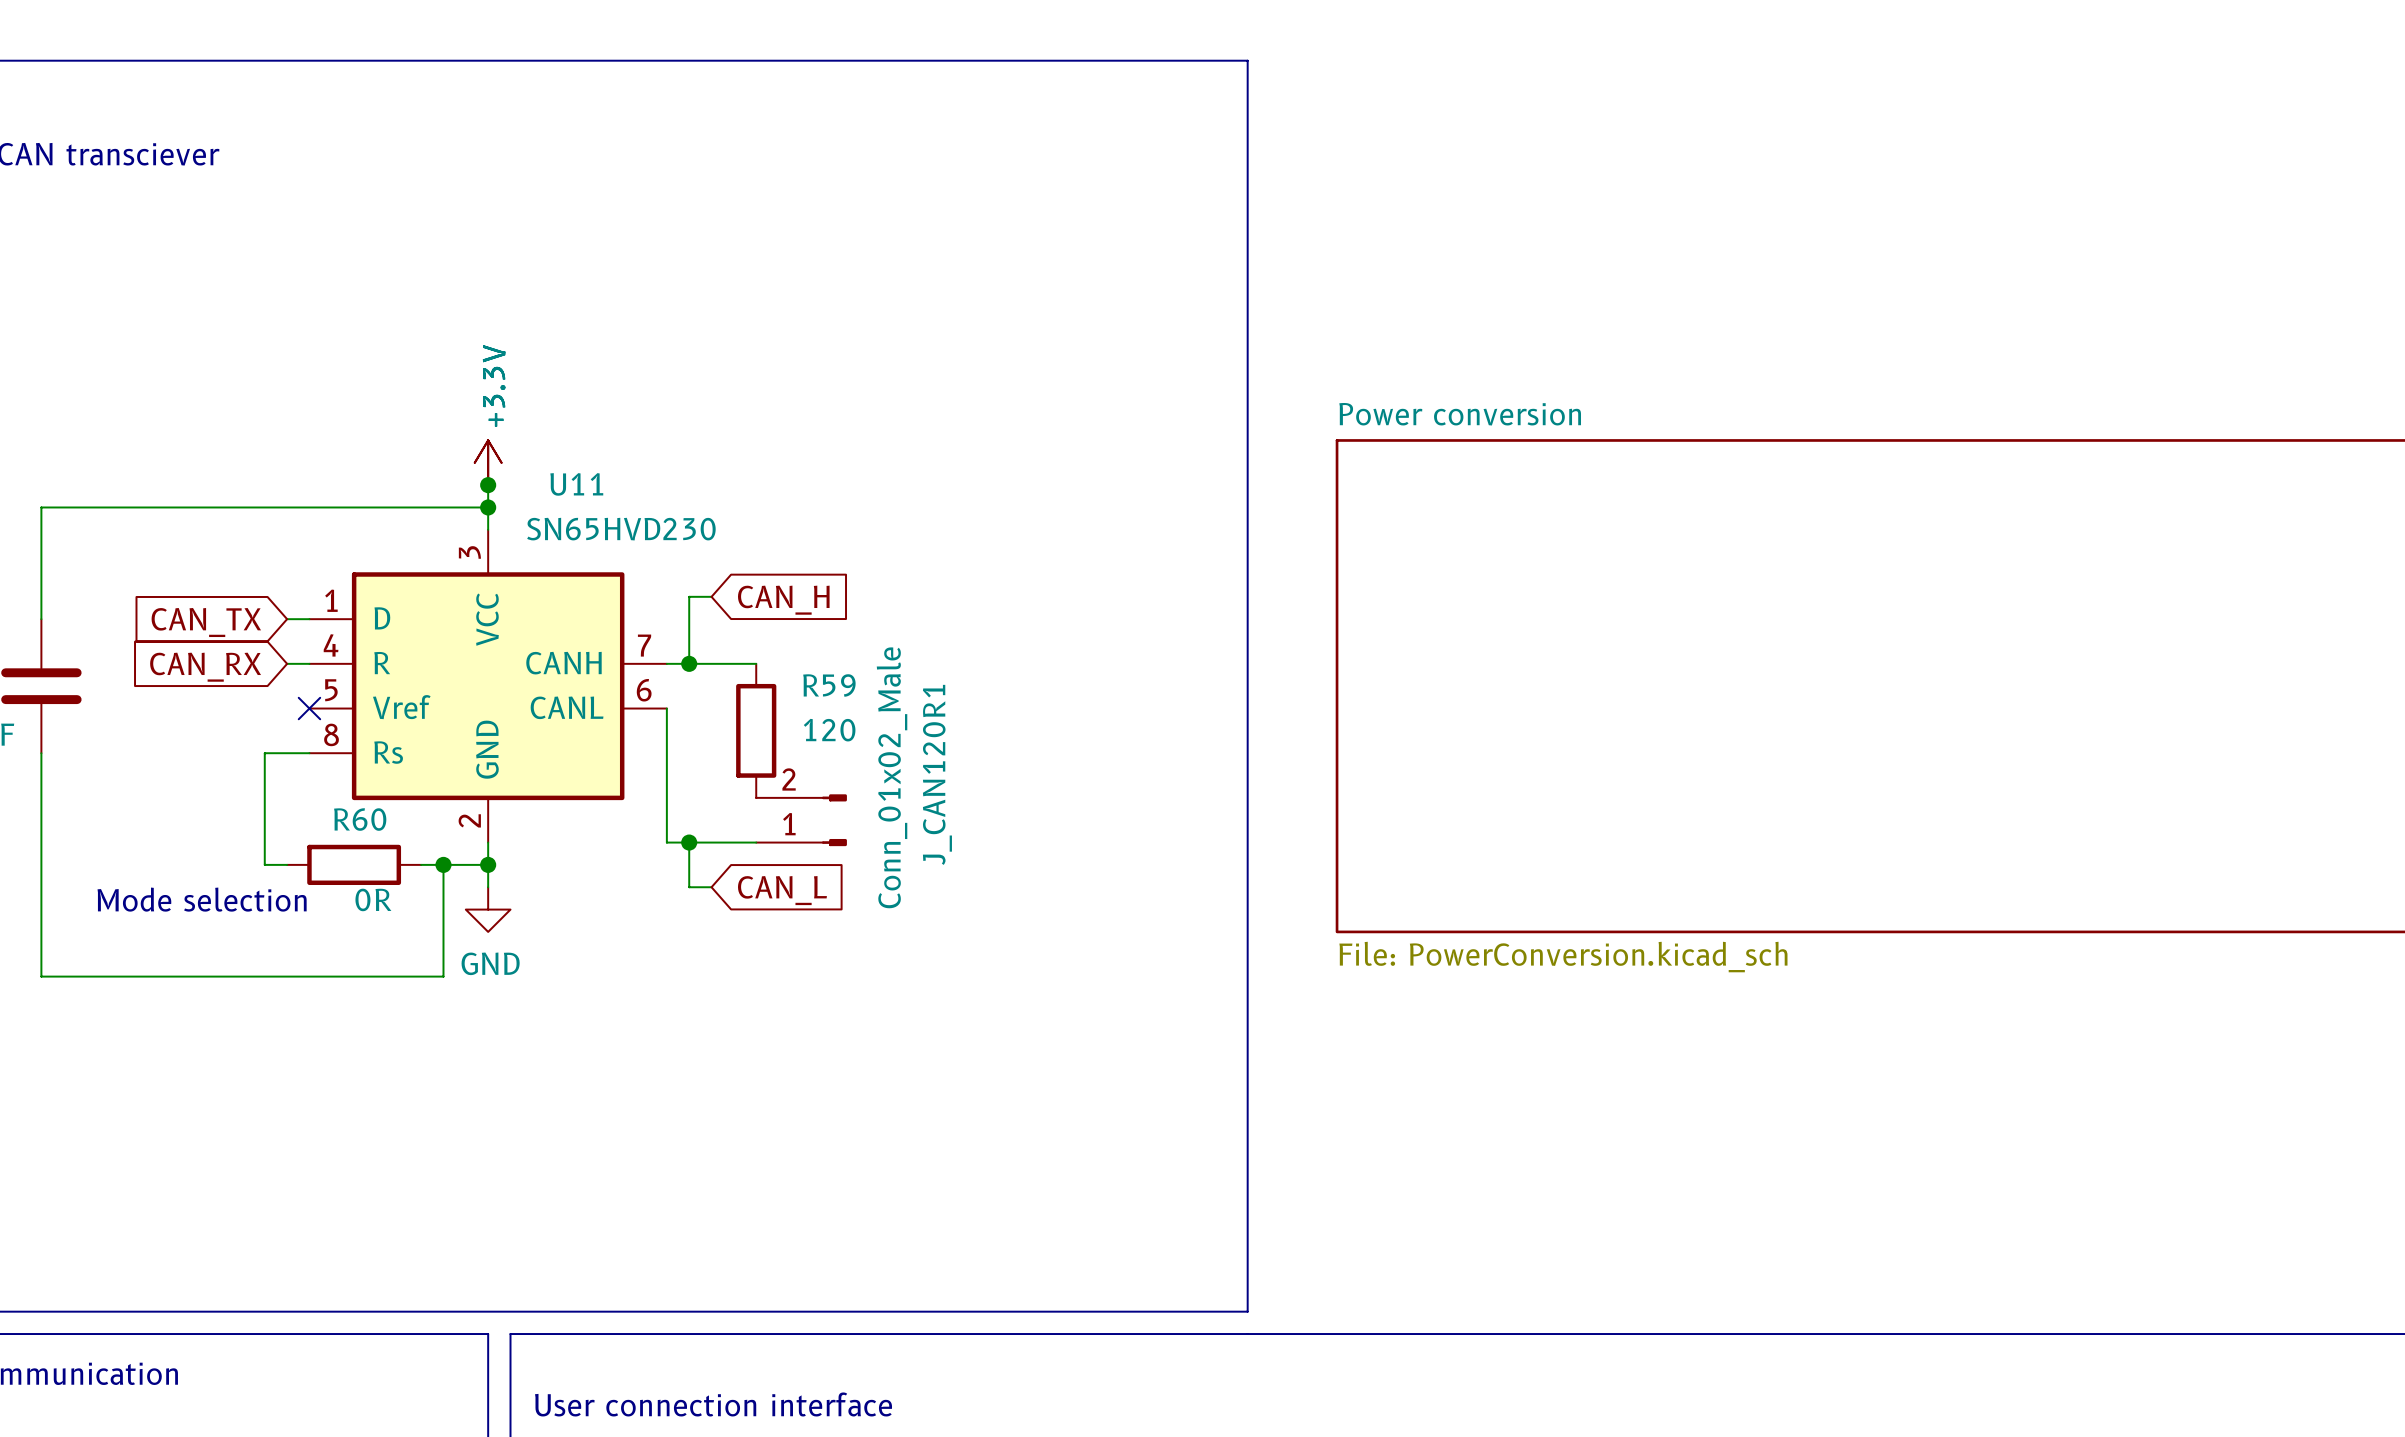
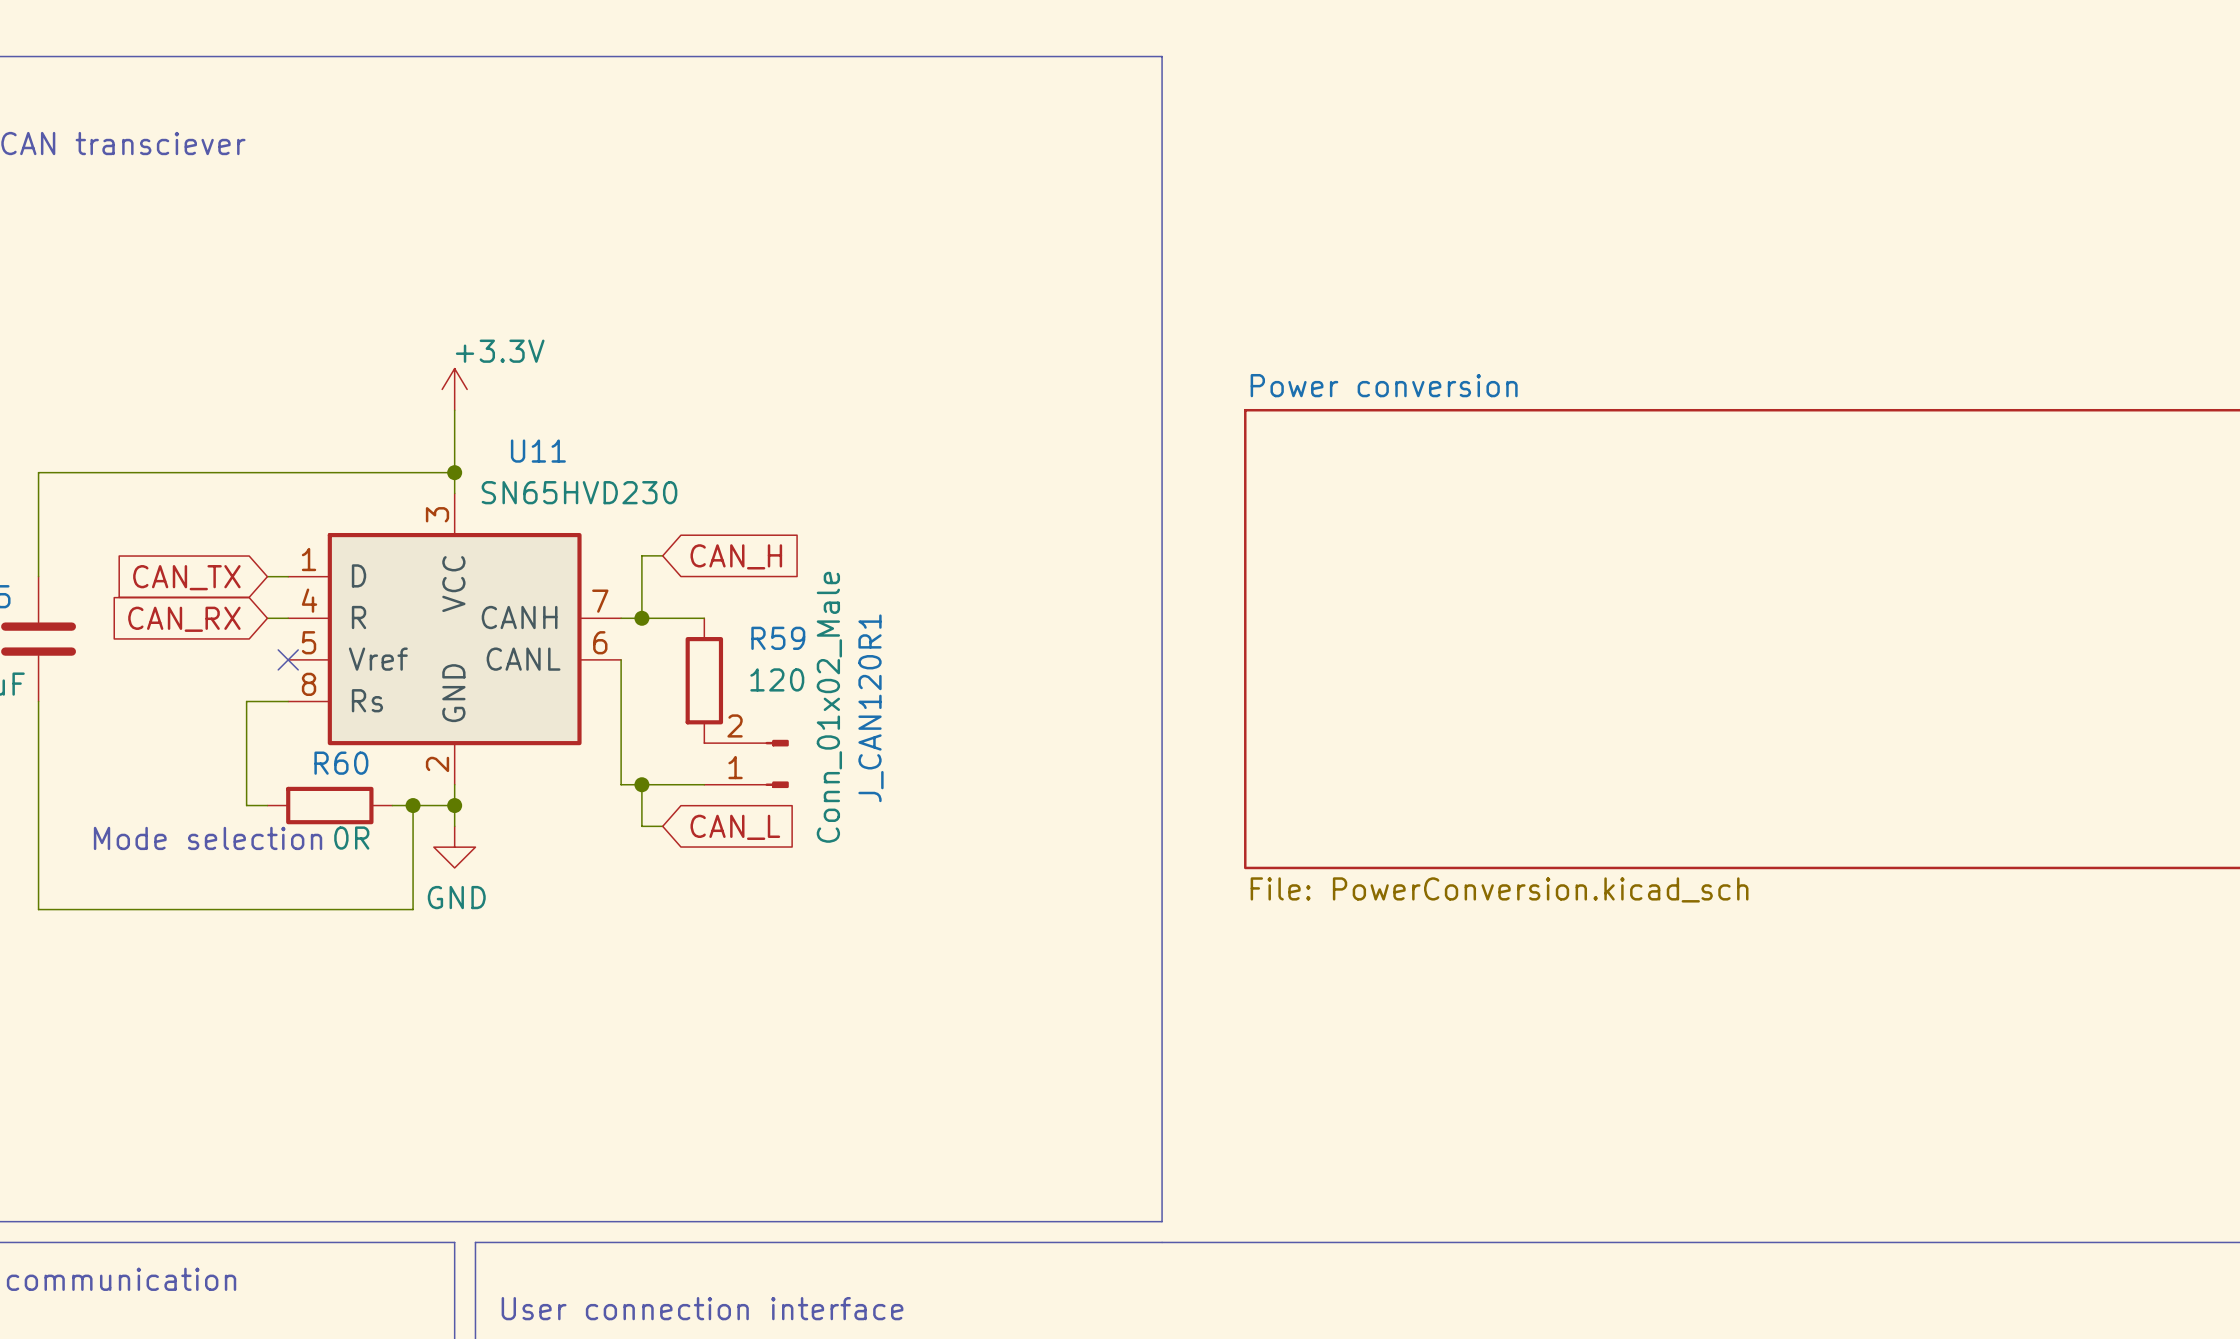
power symbol text rotation: 0° (494, 385) -> 90° clockwise (500, 351)
power symbol position: +3.3V (488, 462) -> +3.3V (454, 389)
junction: (488, 485) -> none

